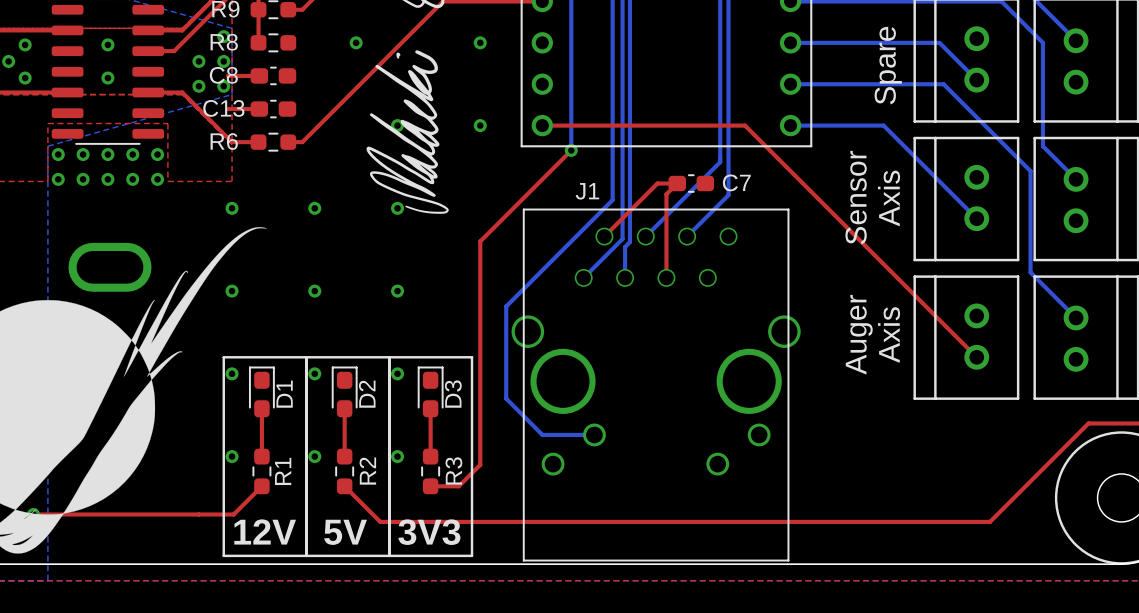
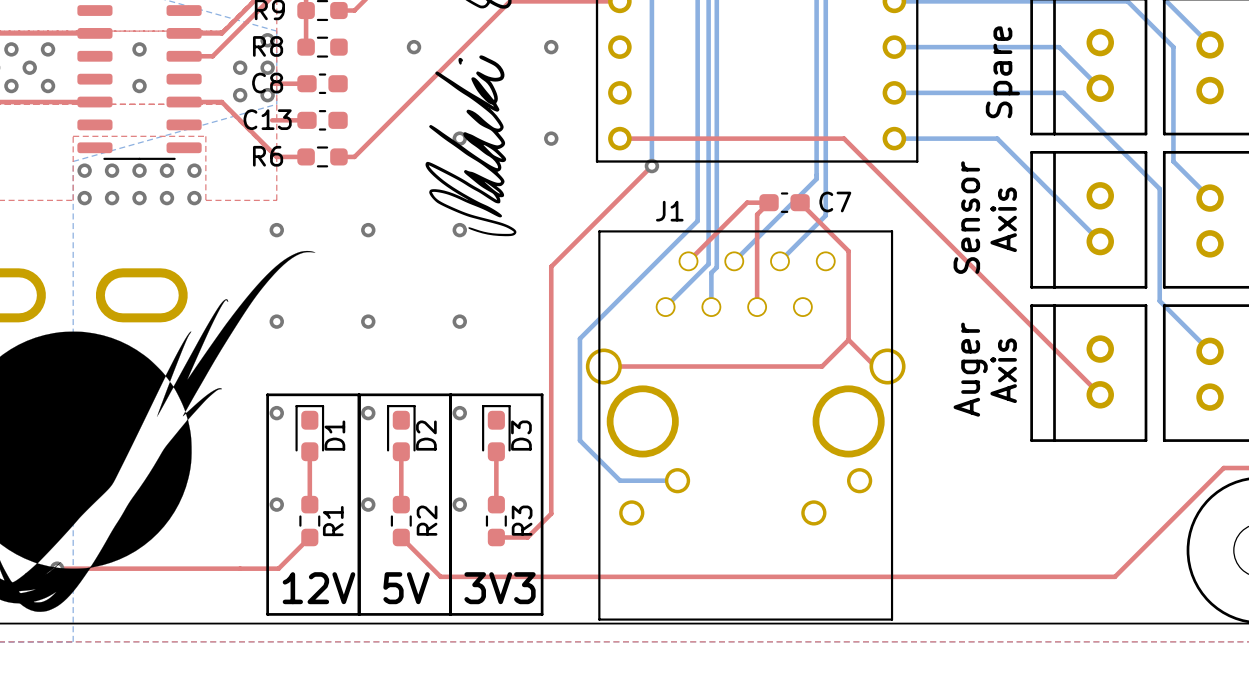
top track: none -> (800, 202) (848, 251) (848, 339)
top track: none -> (848, 339) (822, 366) (603, 366)
top track: none -> (848, 339) (875, 366) (887, 366)

